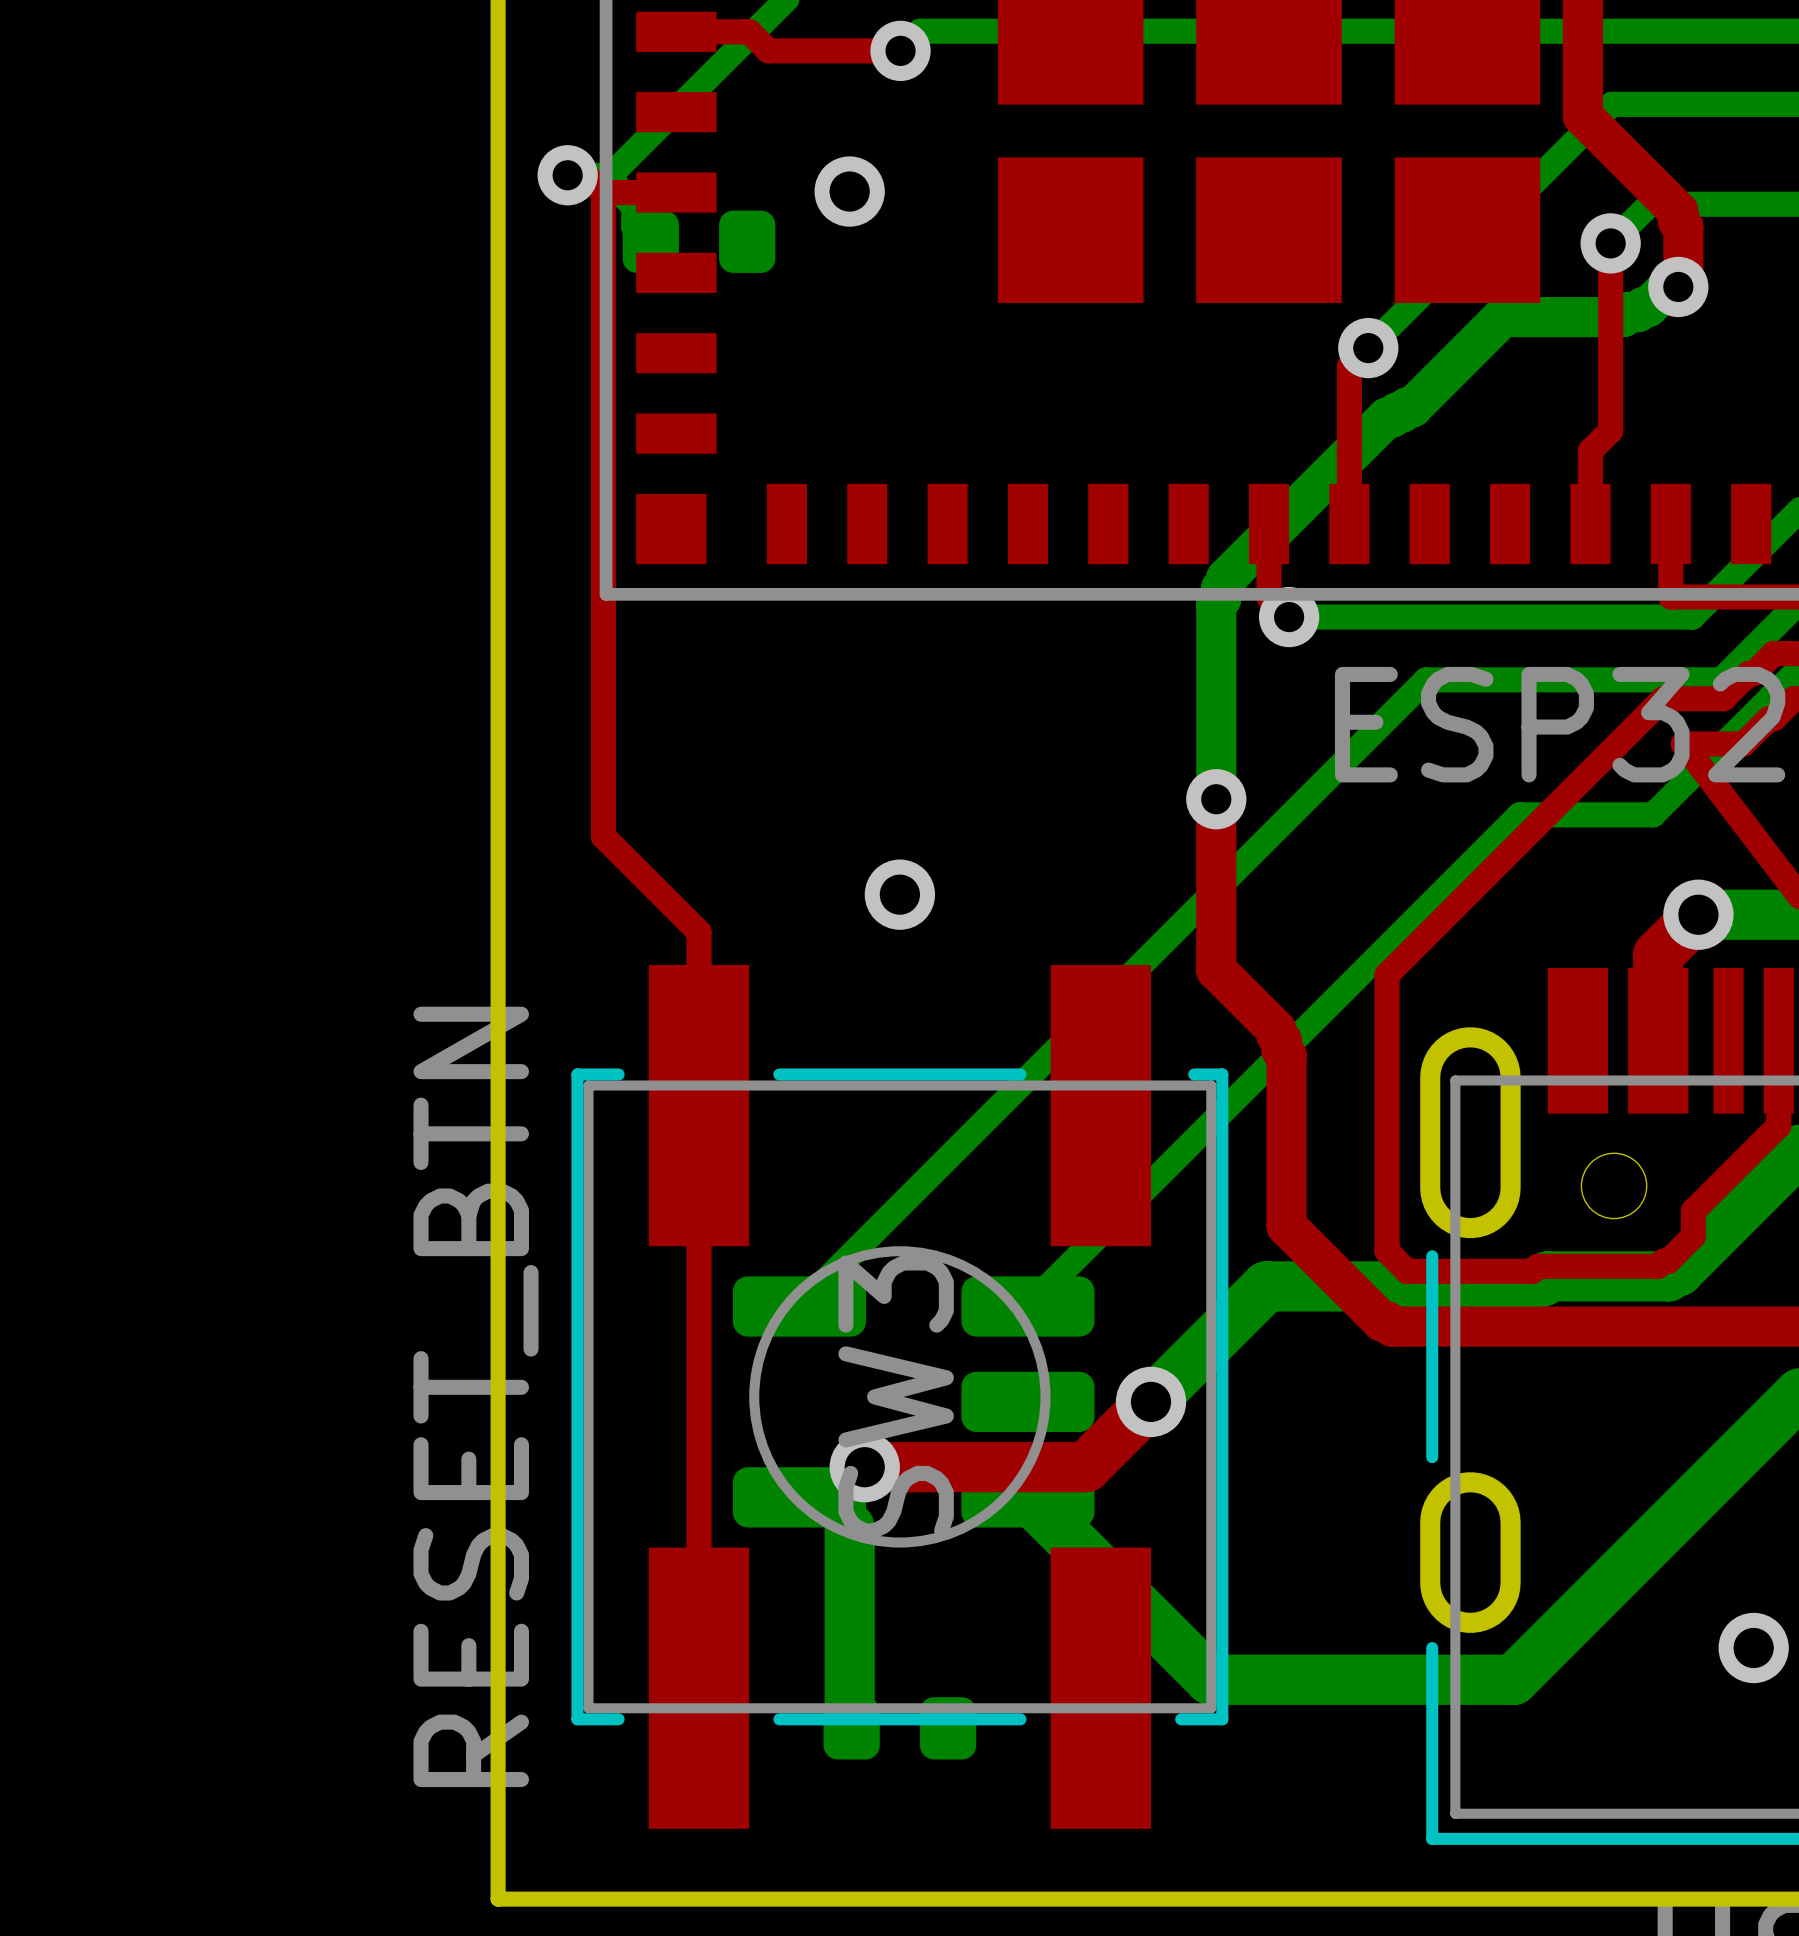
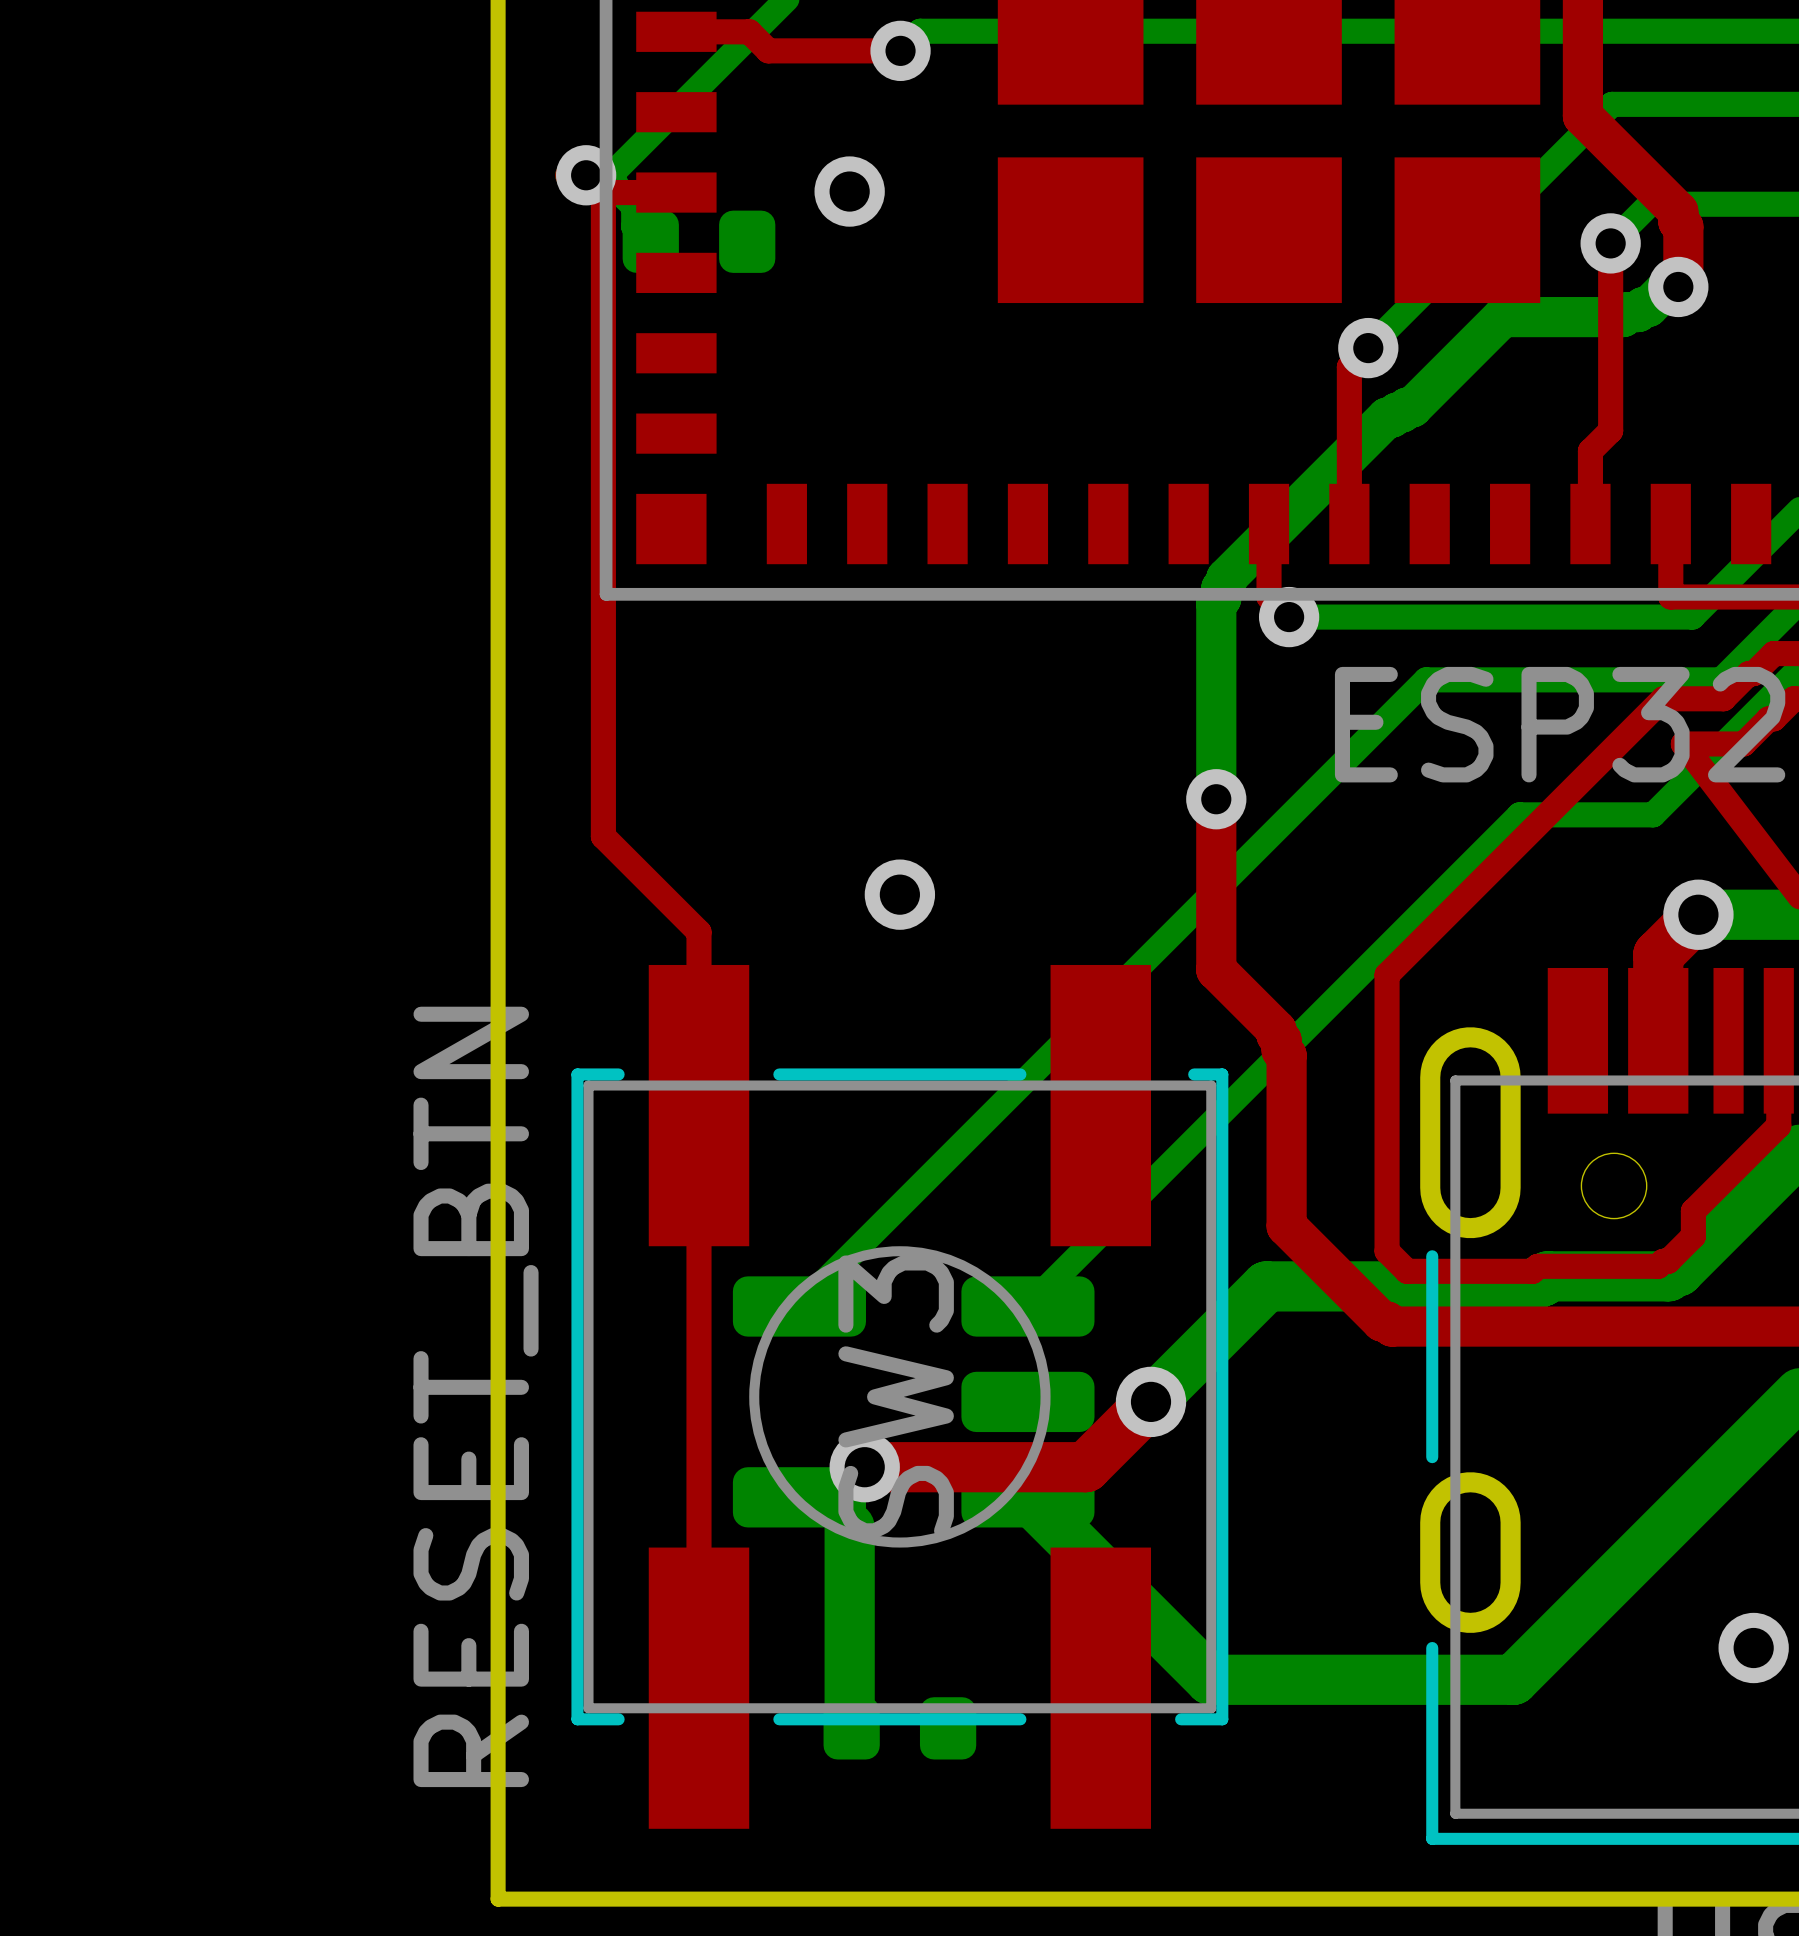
via position: (567, 175) -> (586, 175)

